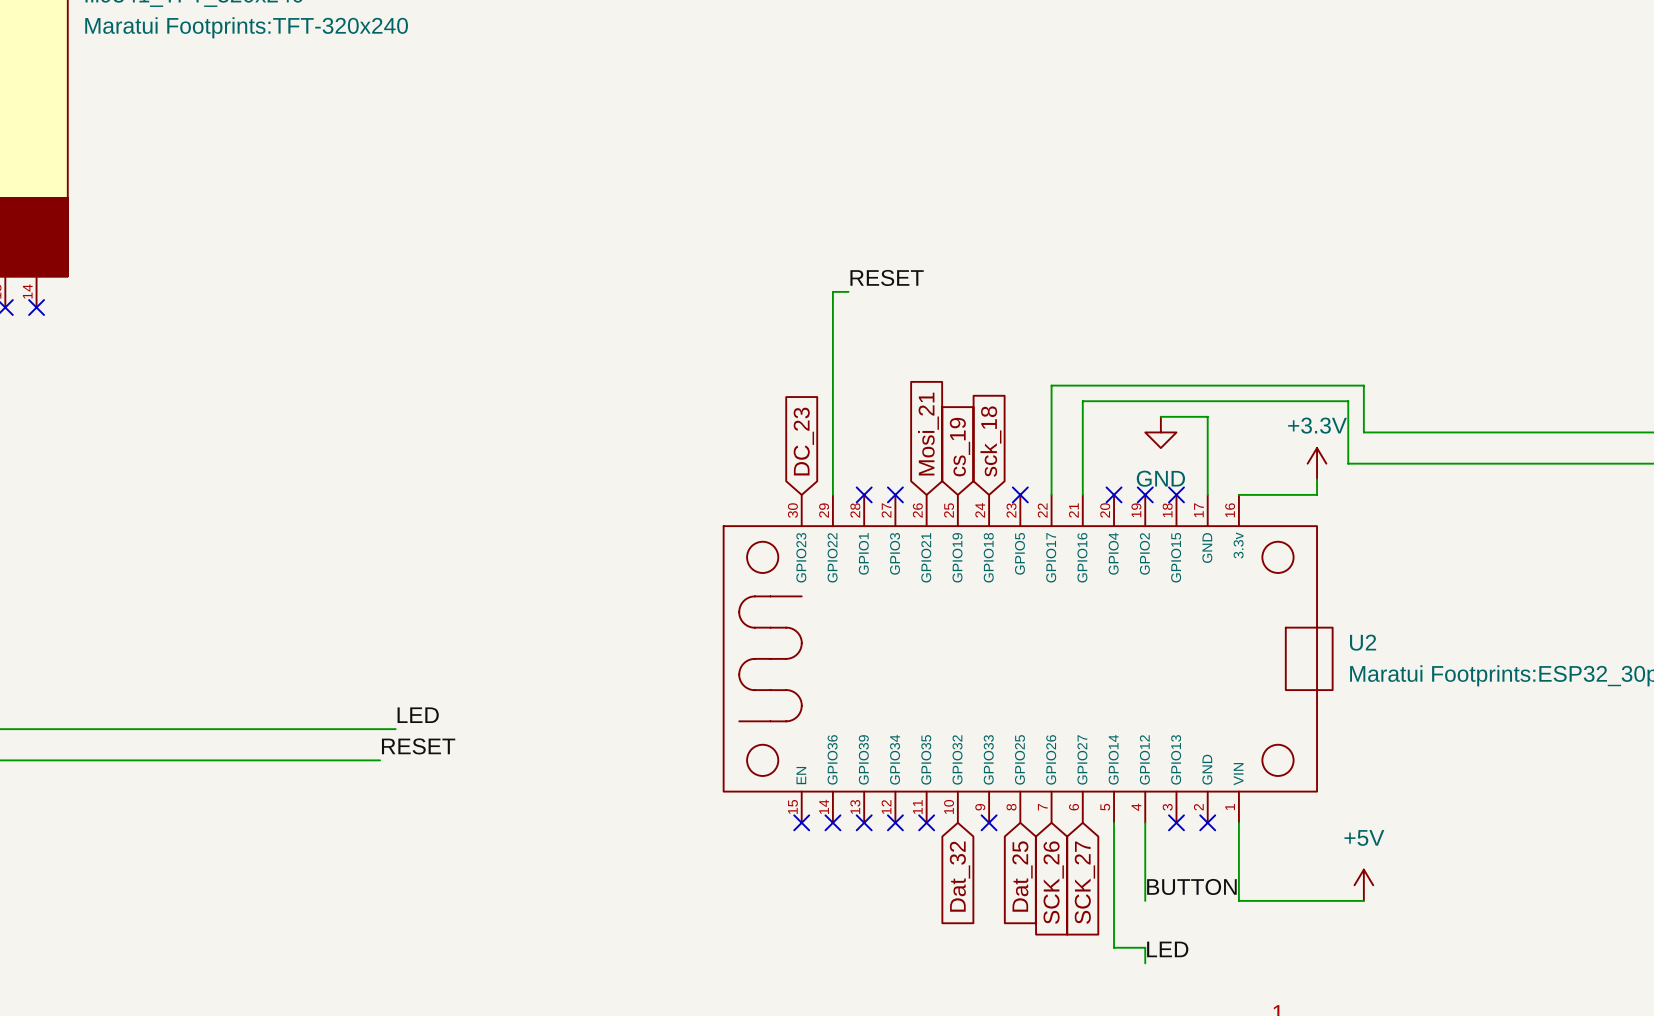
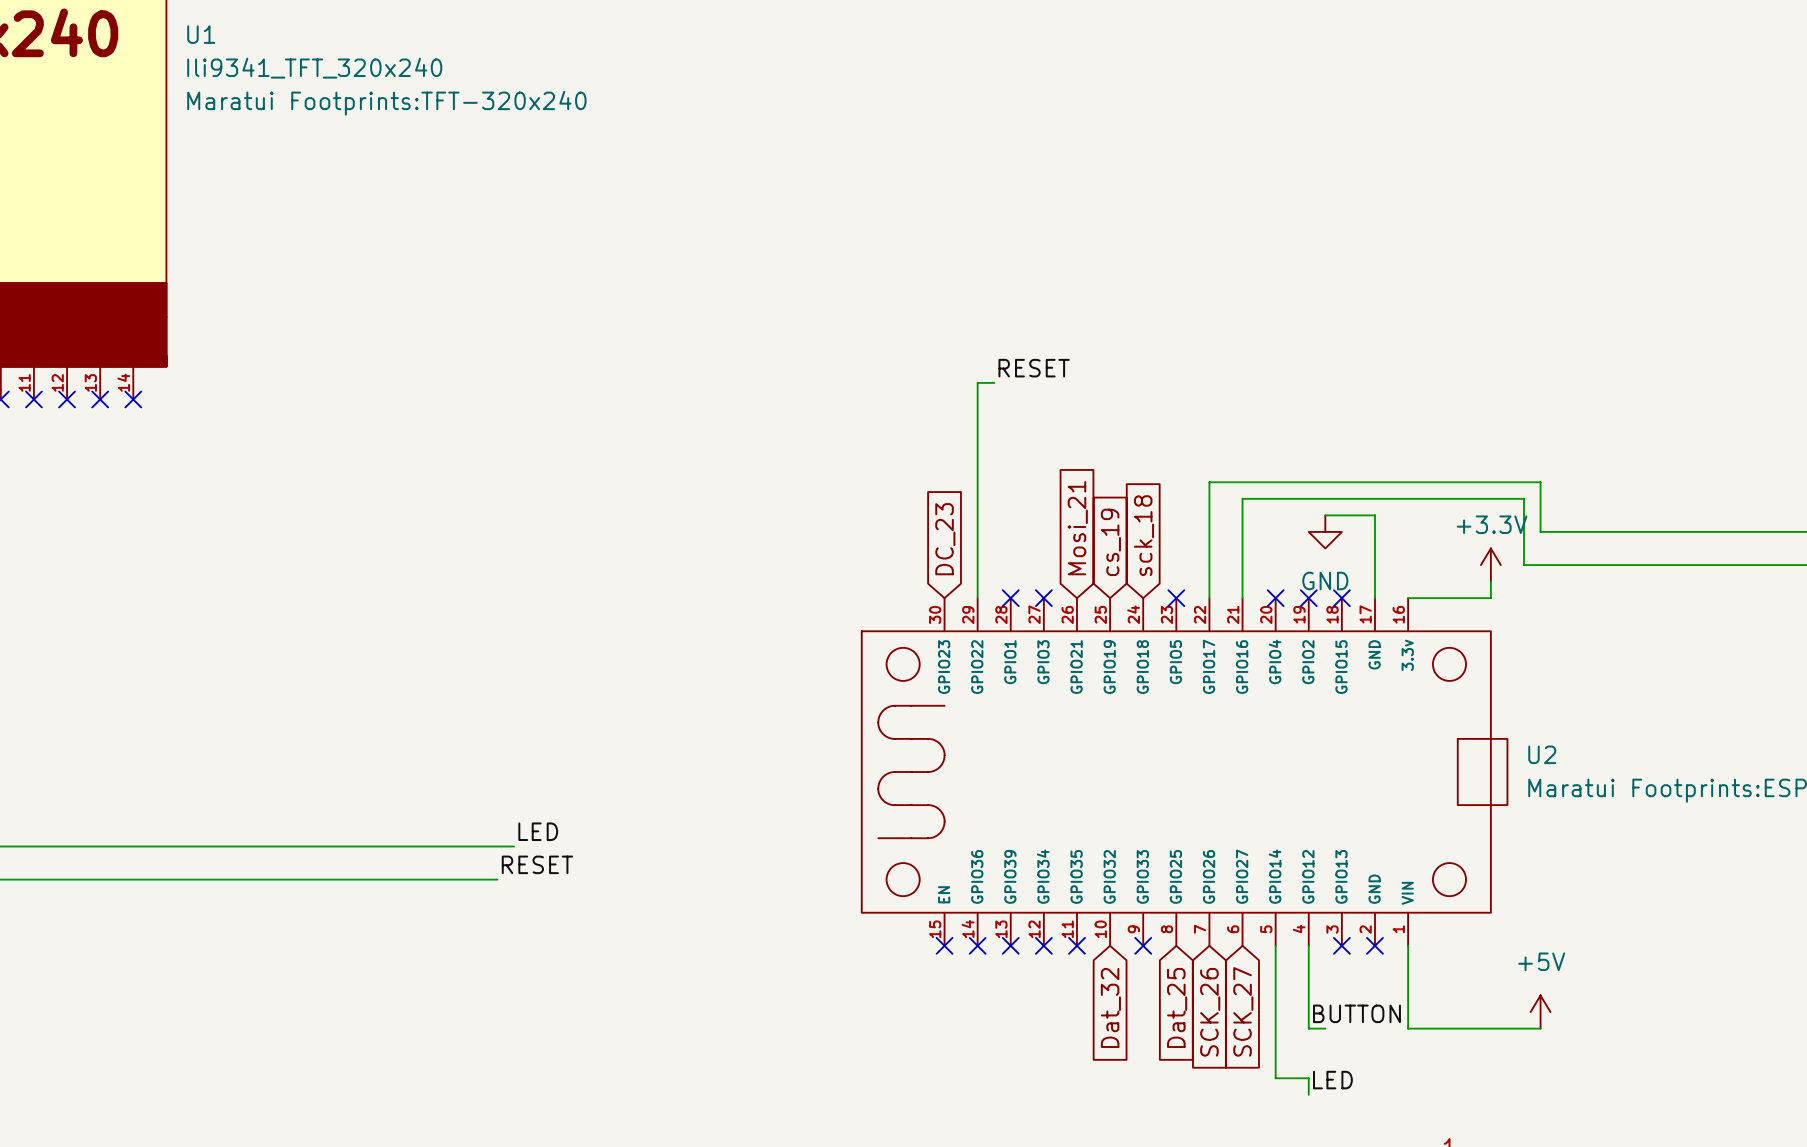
wire: none -> (1308, 1028) (1325, 1028)

